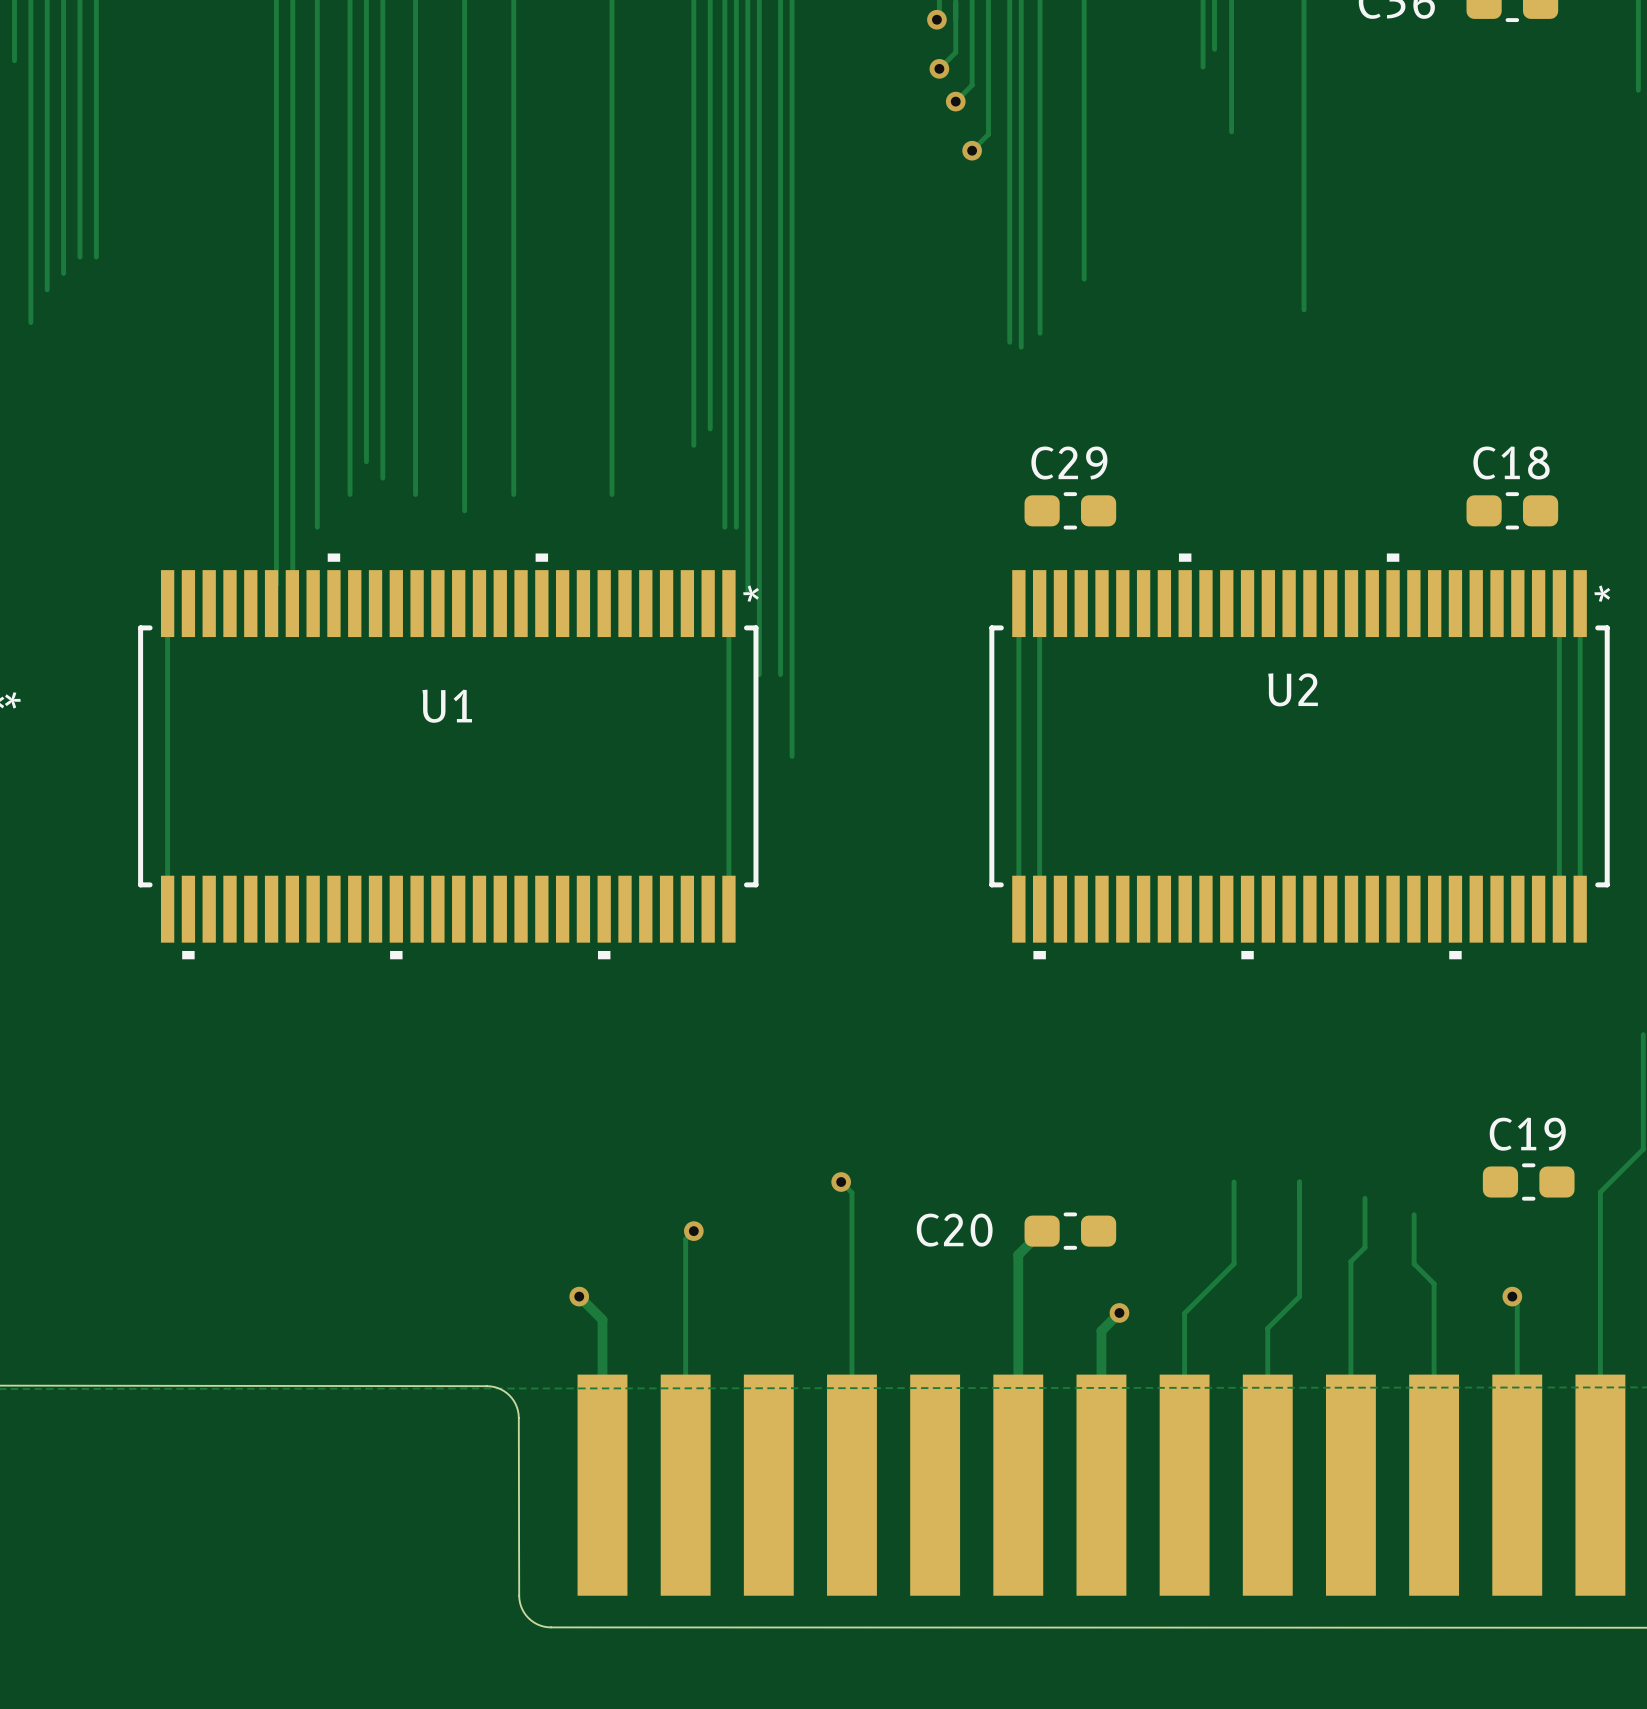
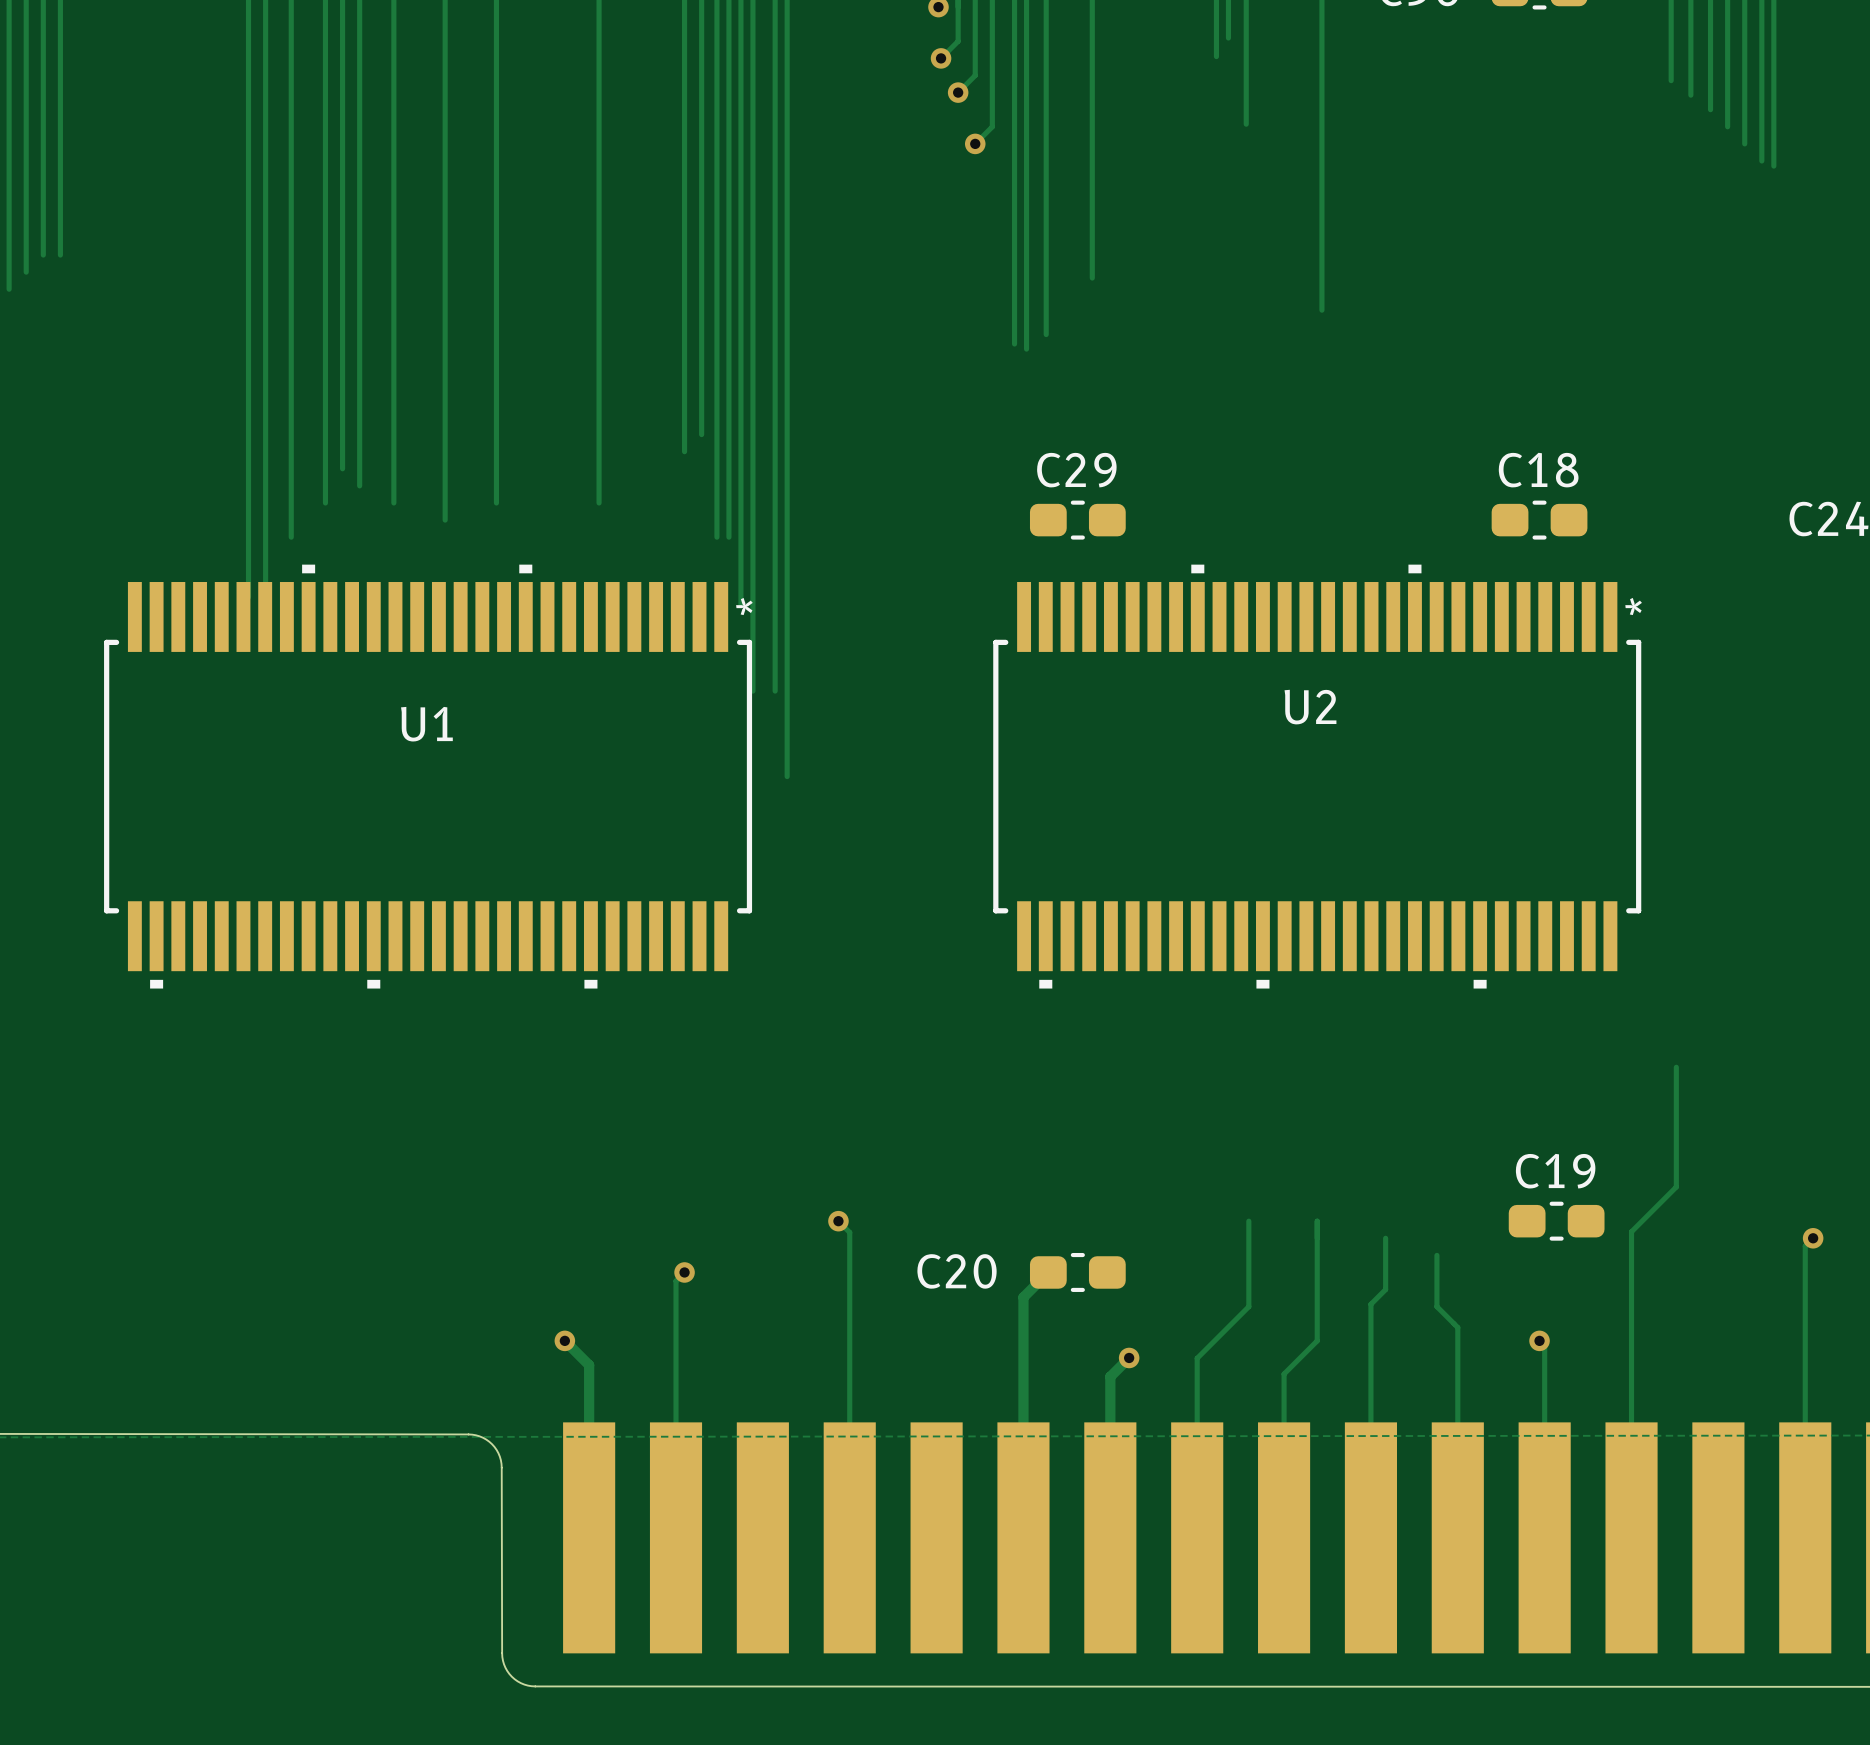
track: (167, 603) (167, 909) -> none
track: (728, 603) (728, 909) -> none
track: (1018, 603) (1018, 909) -> none
track: (1039, 603) (1039, 909) -> none
track: (1559, 603) (1559, 909) -> none
track: (1580, 603) (1580, 909) -> none

